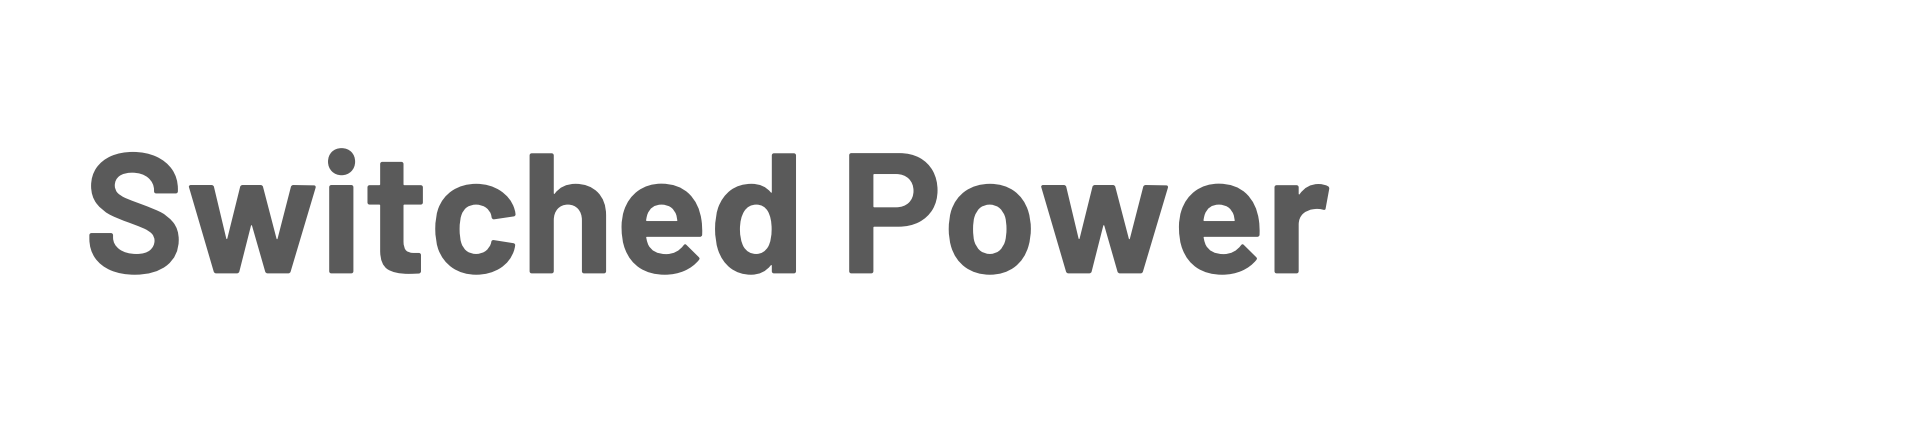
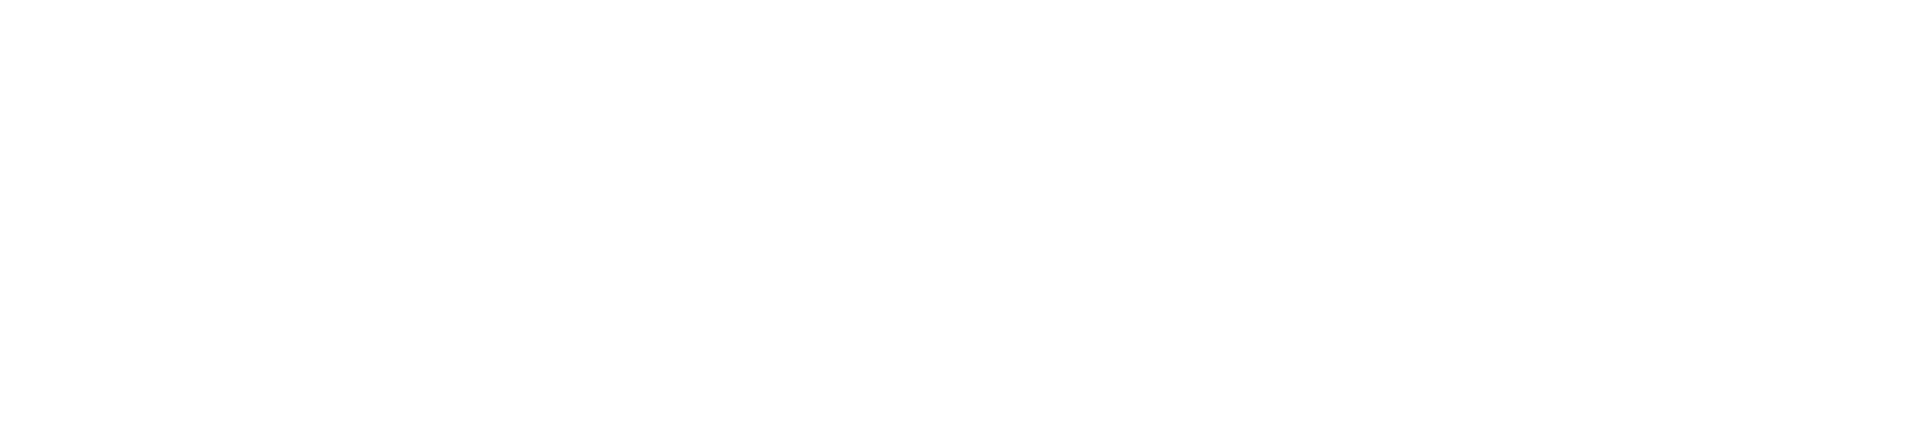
text: Switched Power (709, 211) -> none

